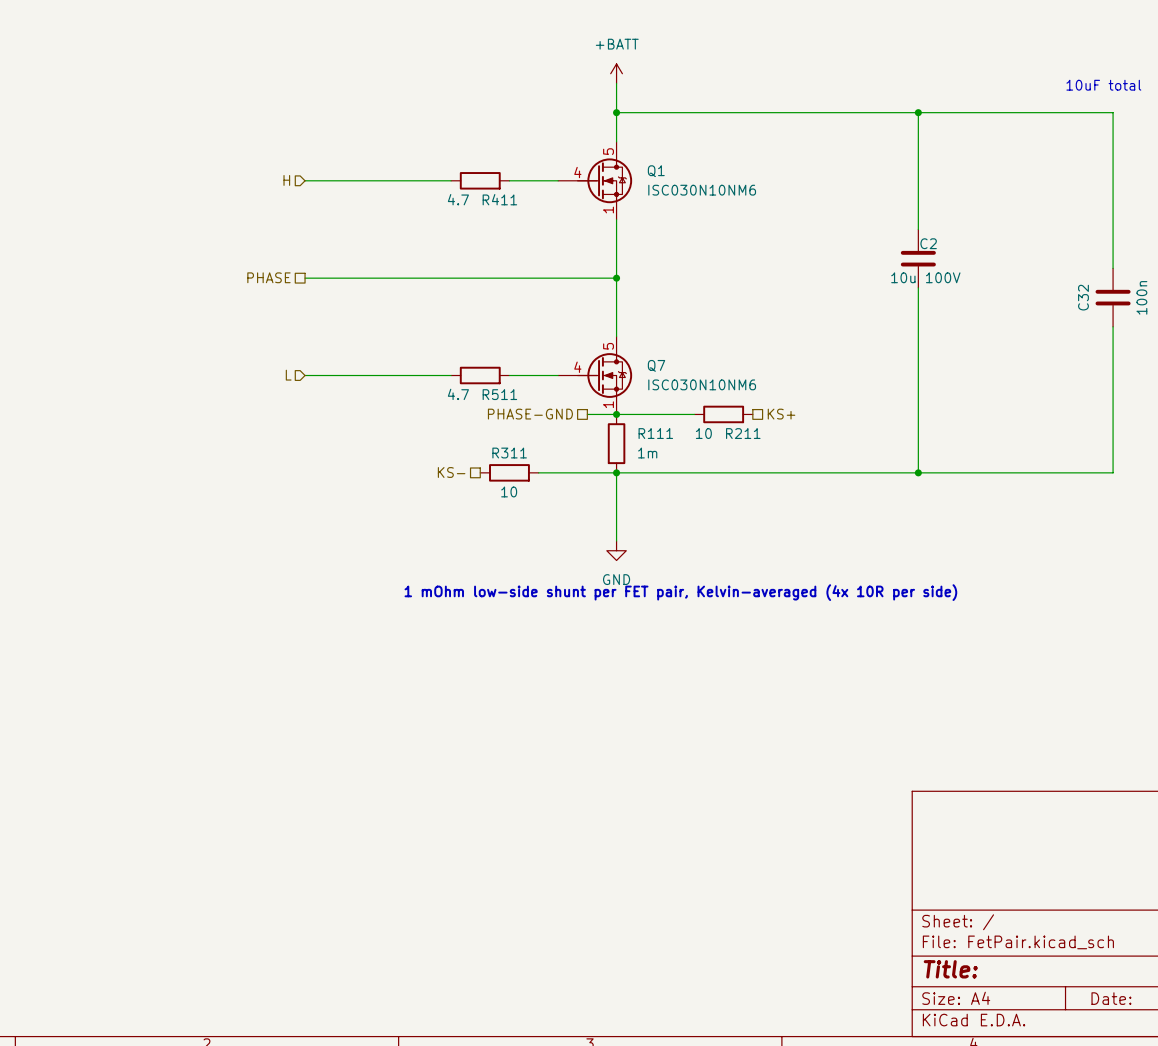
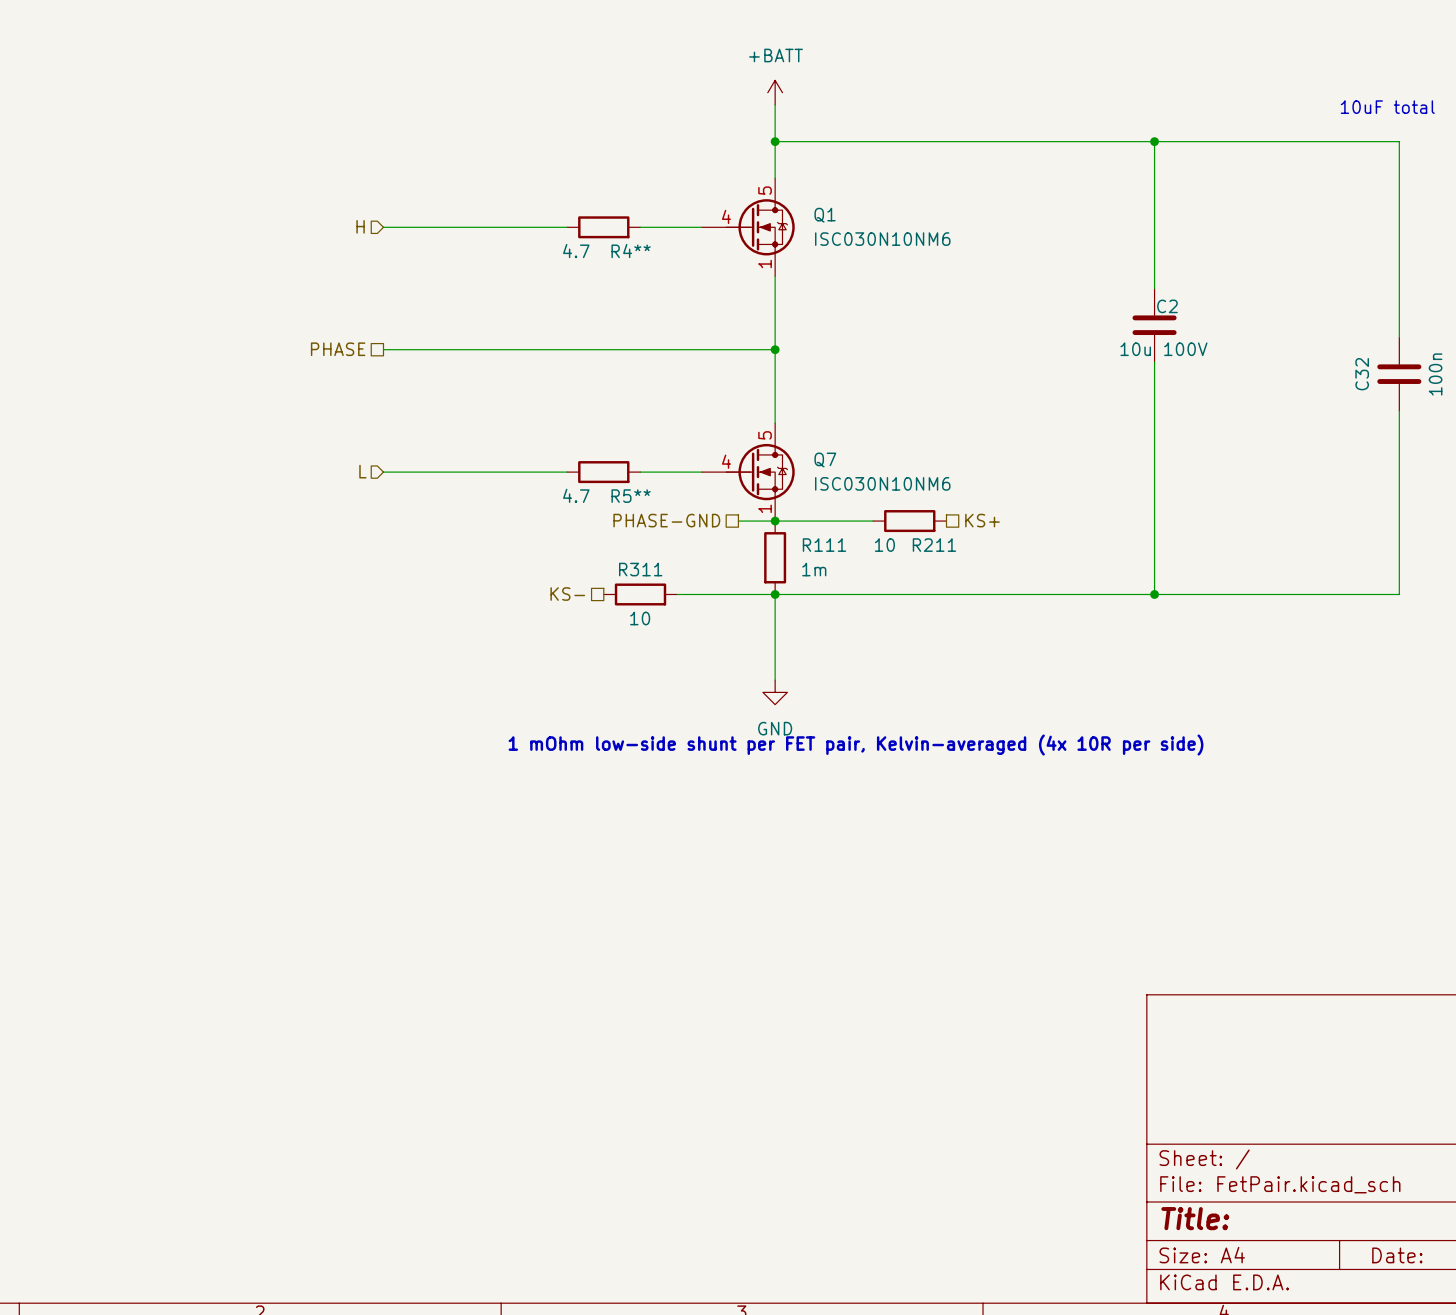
R411 name: R411 (499, 199) -> R4** (631, 251)
R511 name: R511 (499, 394) -> R5** (631, 496)

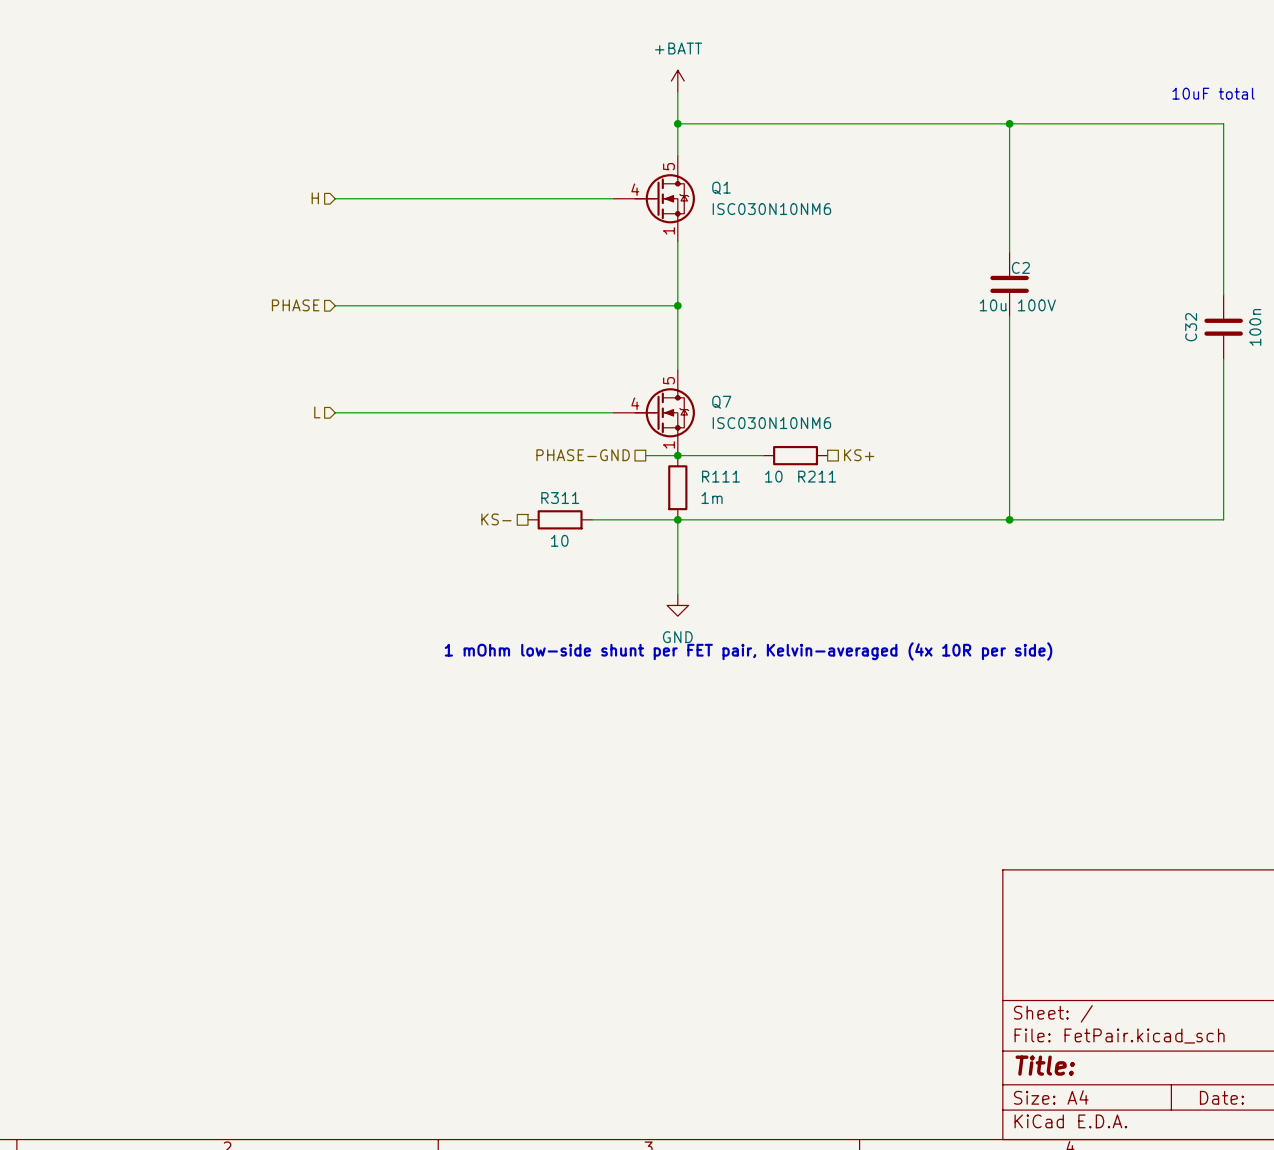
wire: none -> (495, 198) (560, 198)
R4**: 4.7 (603, 227) -> none
hierarchical label shape: passive (338, 349) -> input (295, 305)
wire: none -> (495, 412) (560, 412)
R5**: 4.7 (603, 472) -> none

